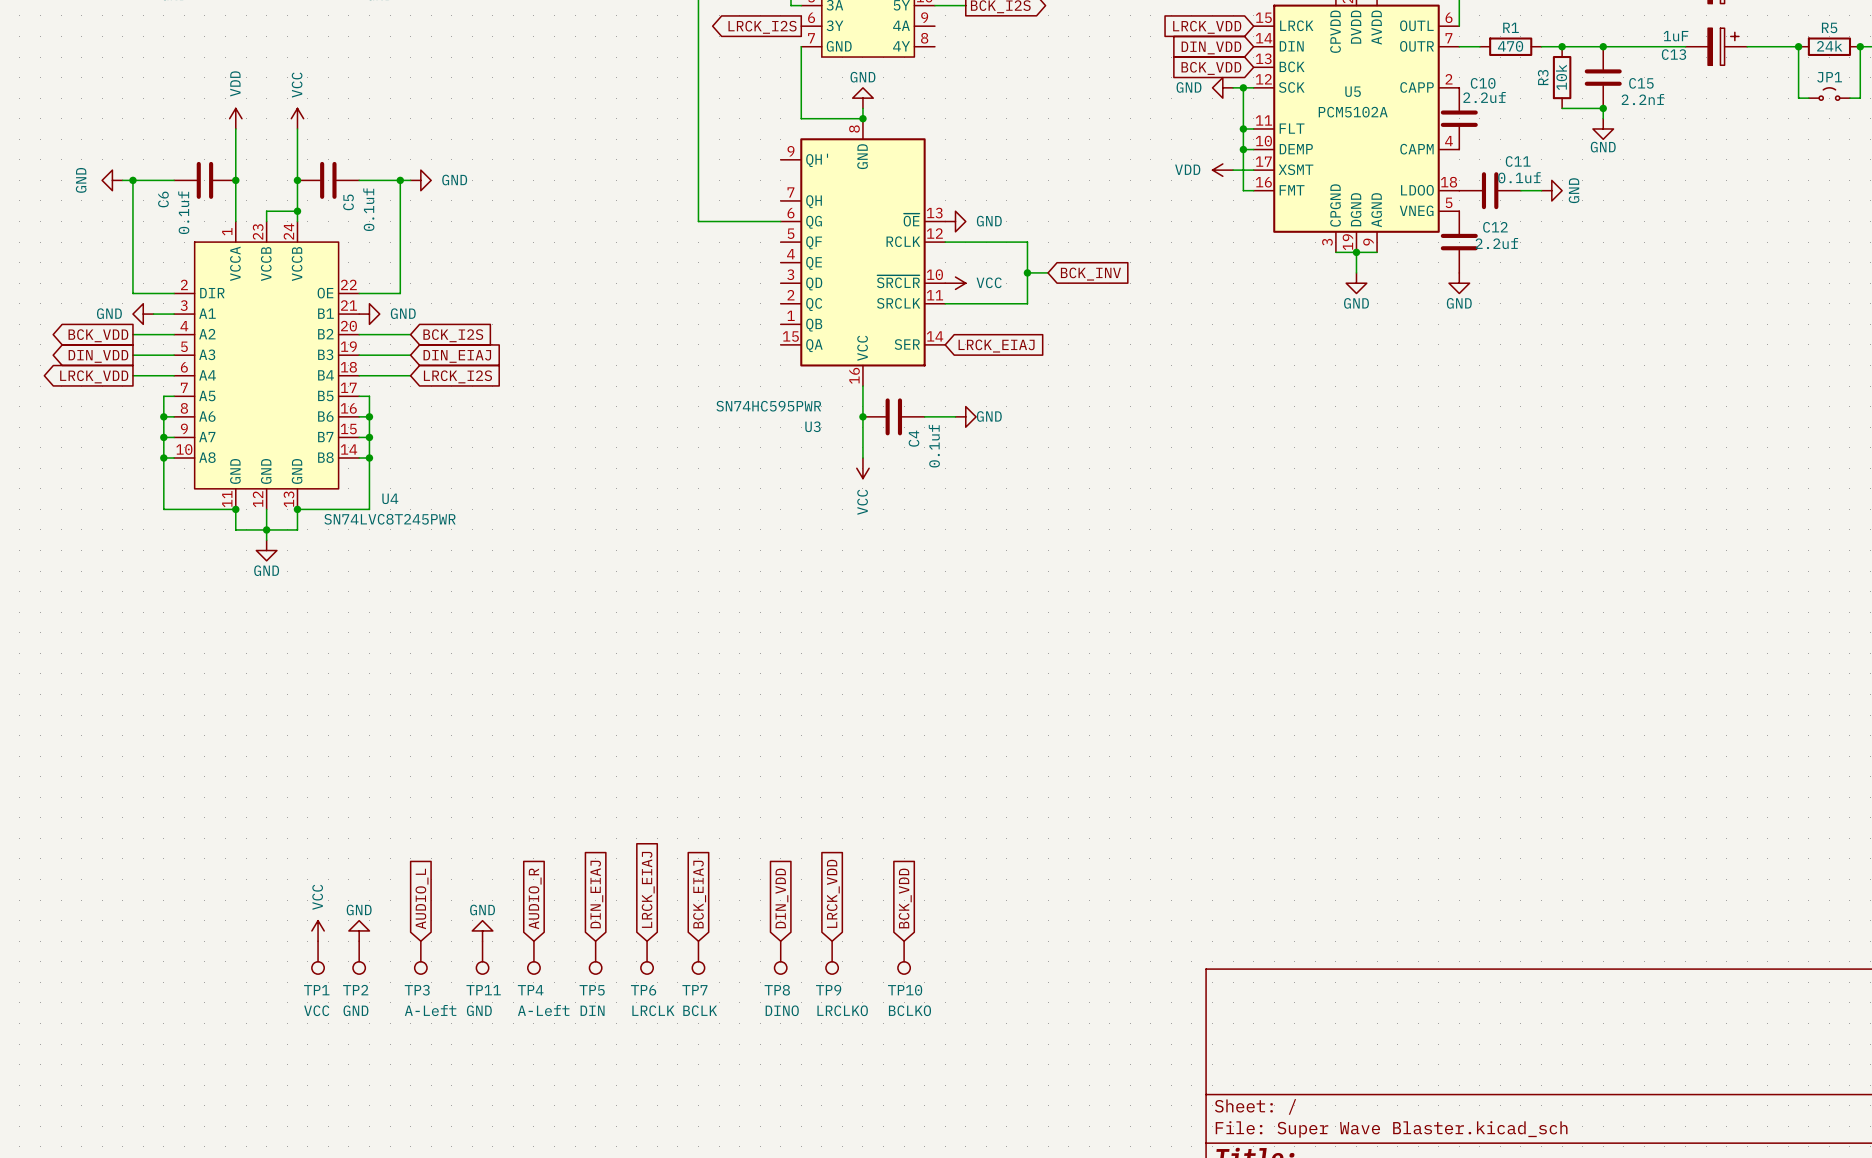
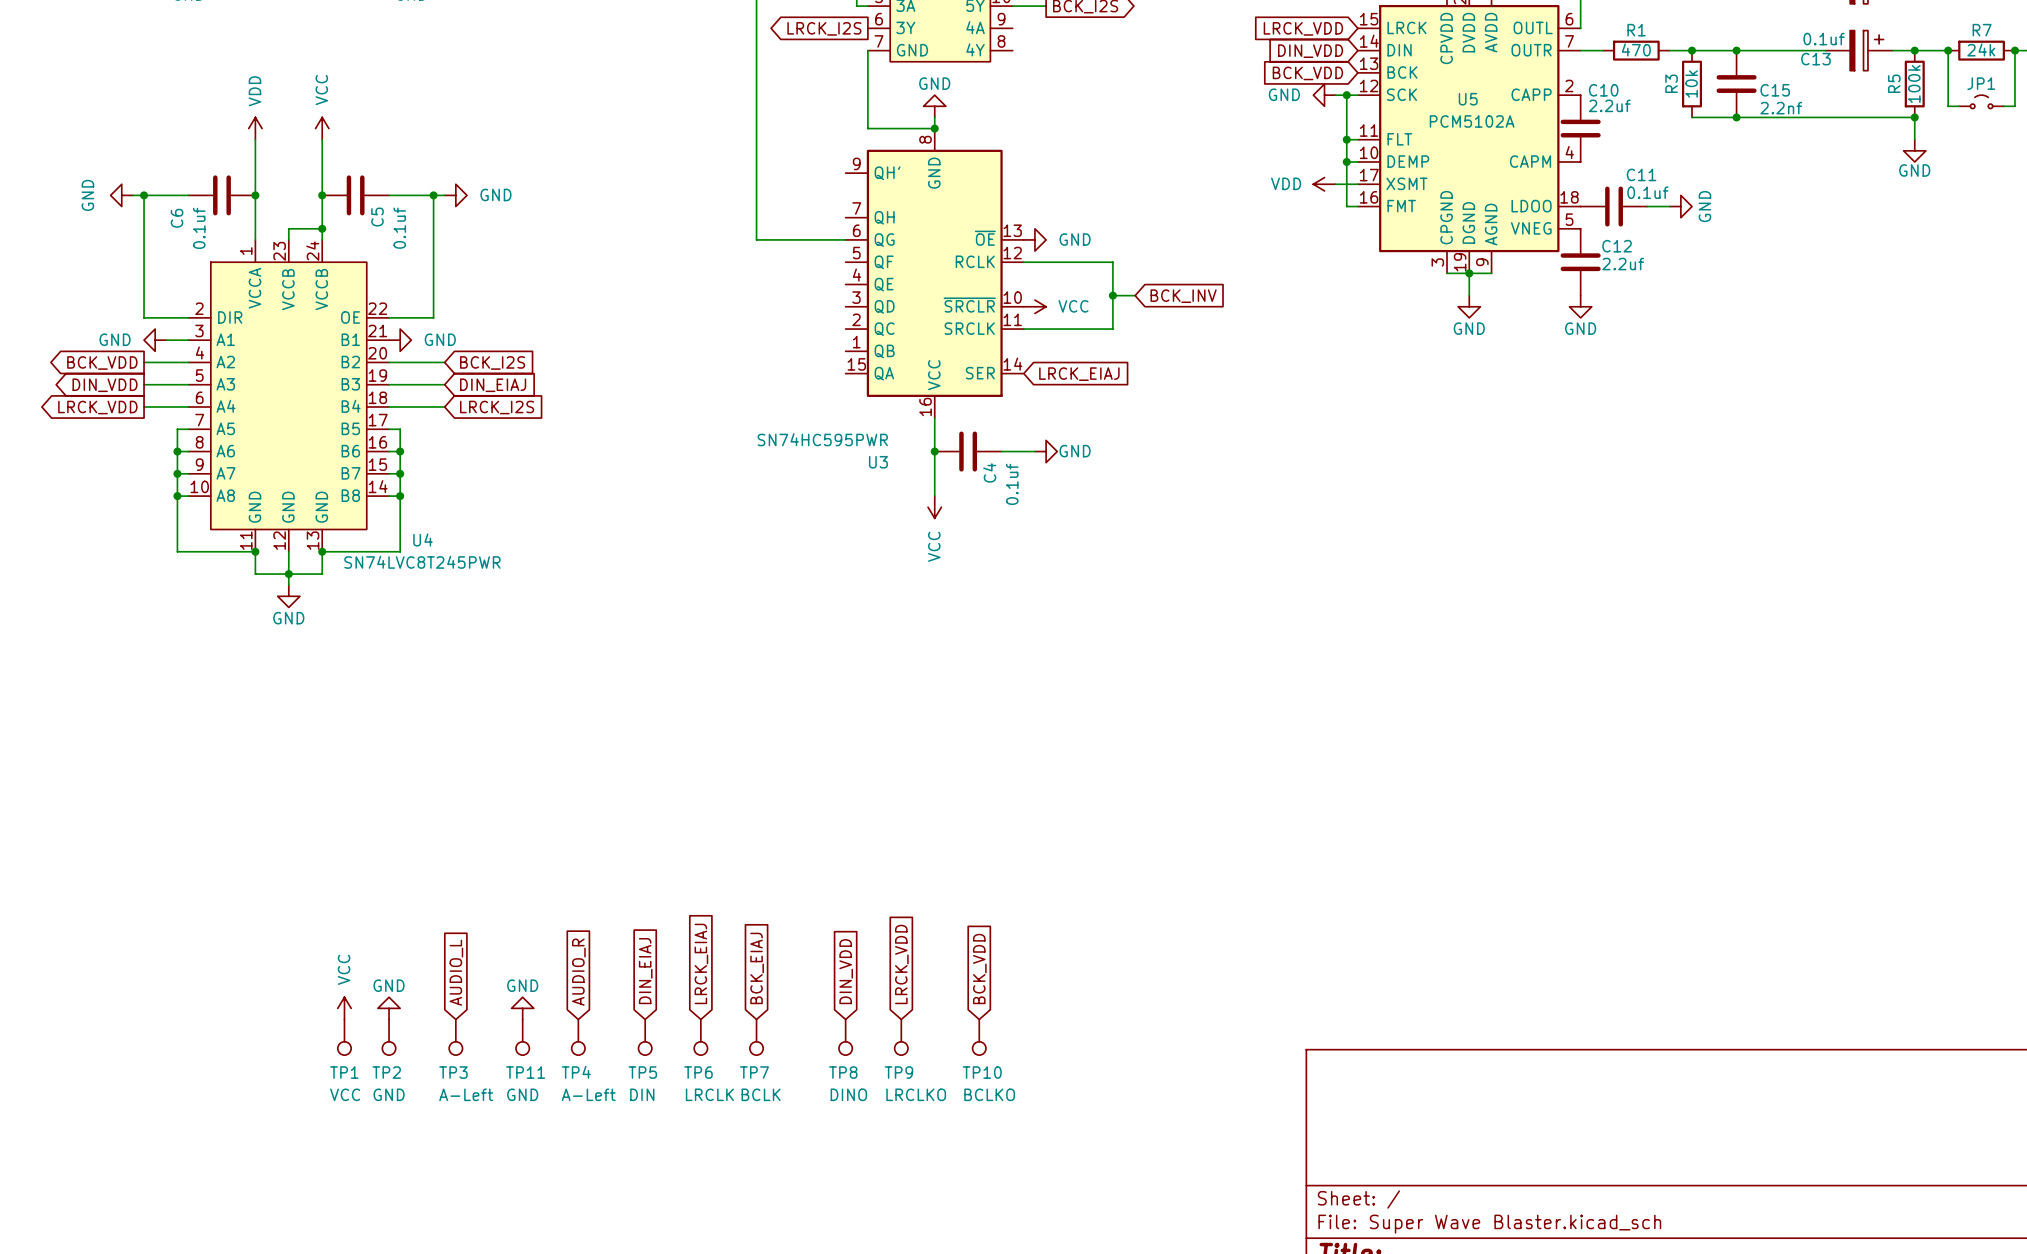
R5 name: R5 (1829, 27) -> R7 (1982, 30)
C13 value: 1uF (1676, 36) -> 0.1uf (1824, 39)
junction: none -> (1914, 50)
R5: none -> 100k (1914, 84)
wire: (1603, 108) (1603, 118) -> (1736, 117) (1914, 117) (1914, 139)
junction: none -> (1914, 117)
power symbol position: GND (1603, 128) -> GND (1914, 150)

